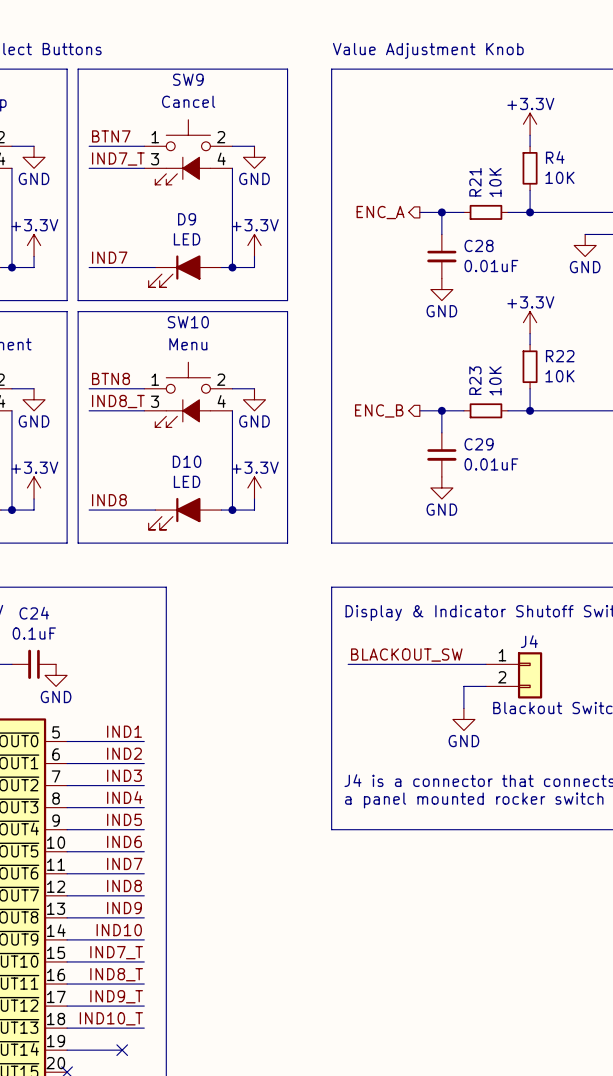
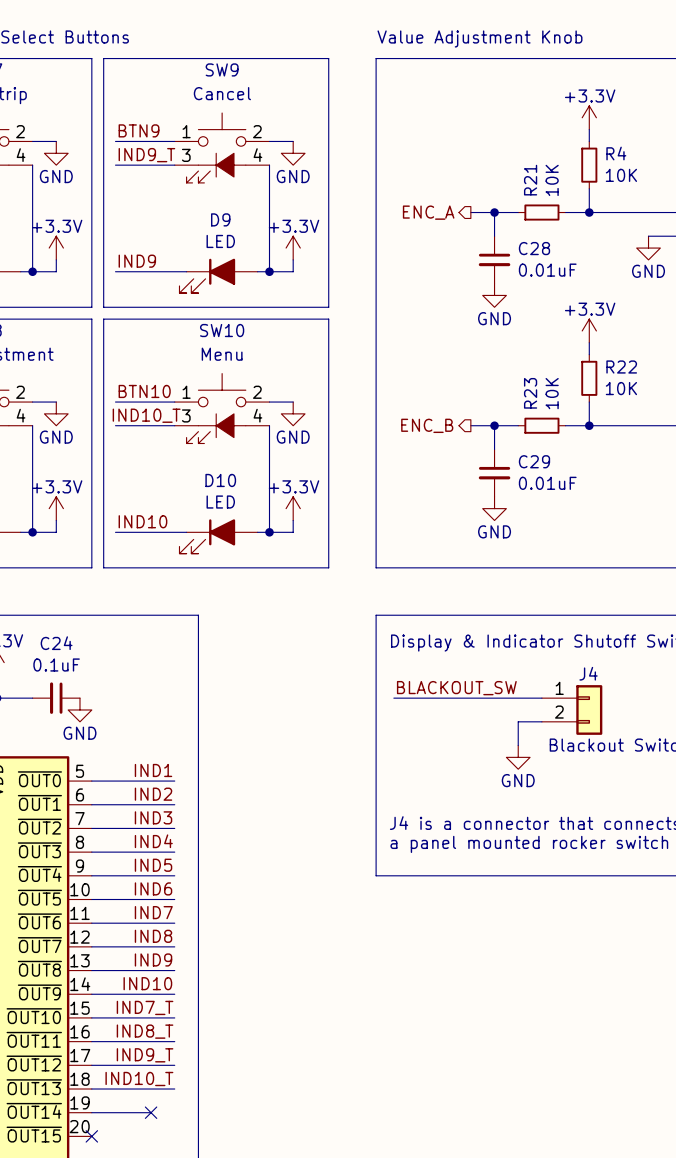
label: BTN7 (111, 136) -> BTN9 (139, 130)
label: IND7_T (118, 159) -> IND9_T (146, 155)
label: IND7 (109, 257) -> IND9 (137, 261)
label: BTN8 (111, 378) -> BTN10 (144, 391)
label: IND8_T (118, 401) -> IND10_T (146, 415)
label: IND8 (109, 500) -> IND10 (142, 521)

